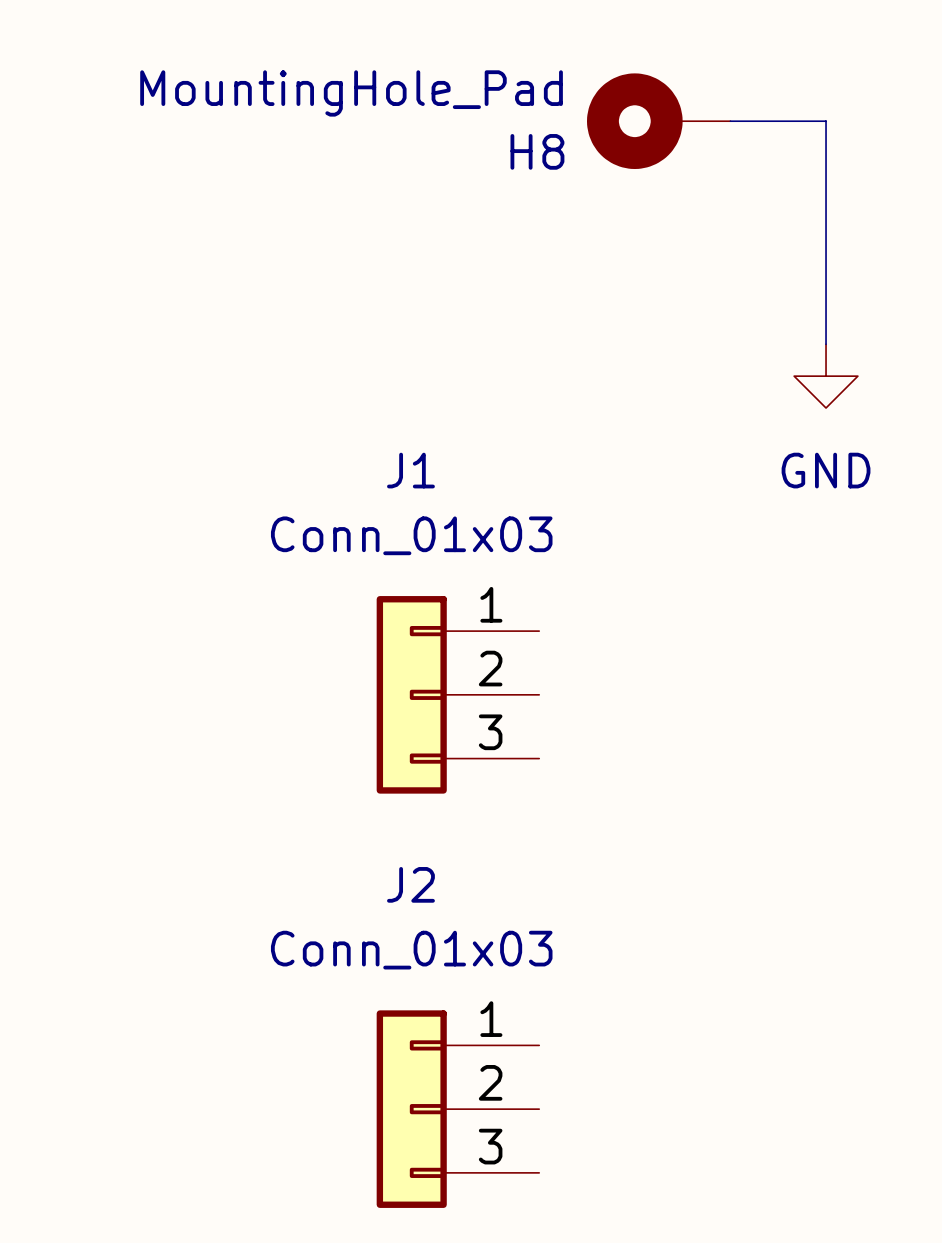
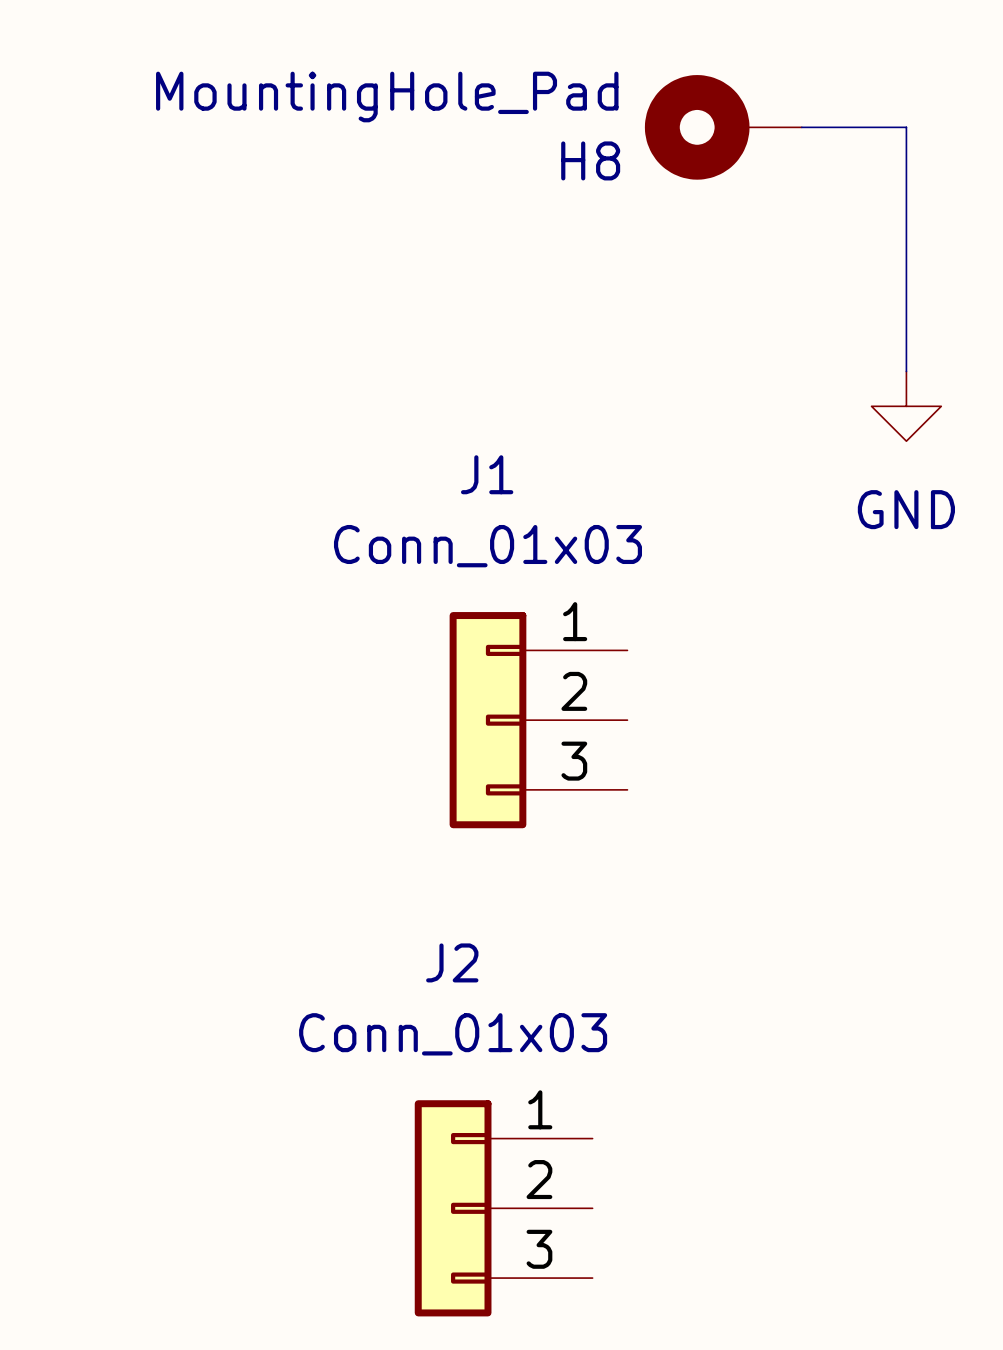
J1 position: (457, 694) -> (538, 720)

